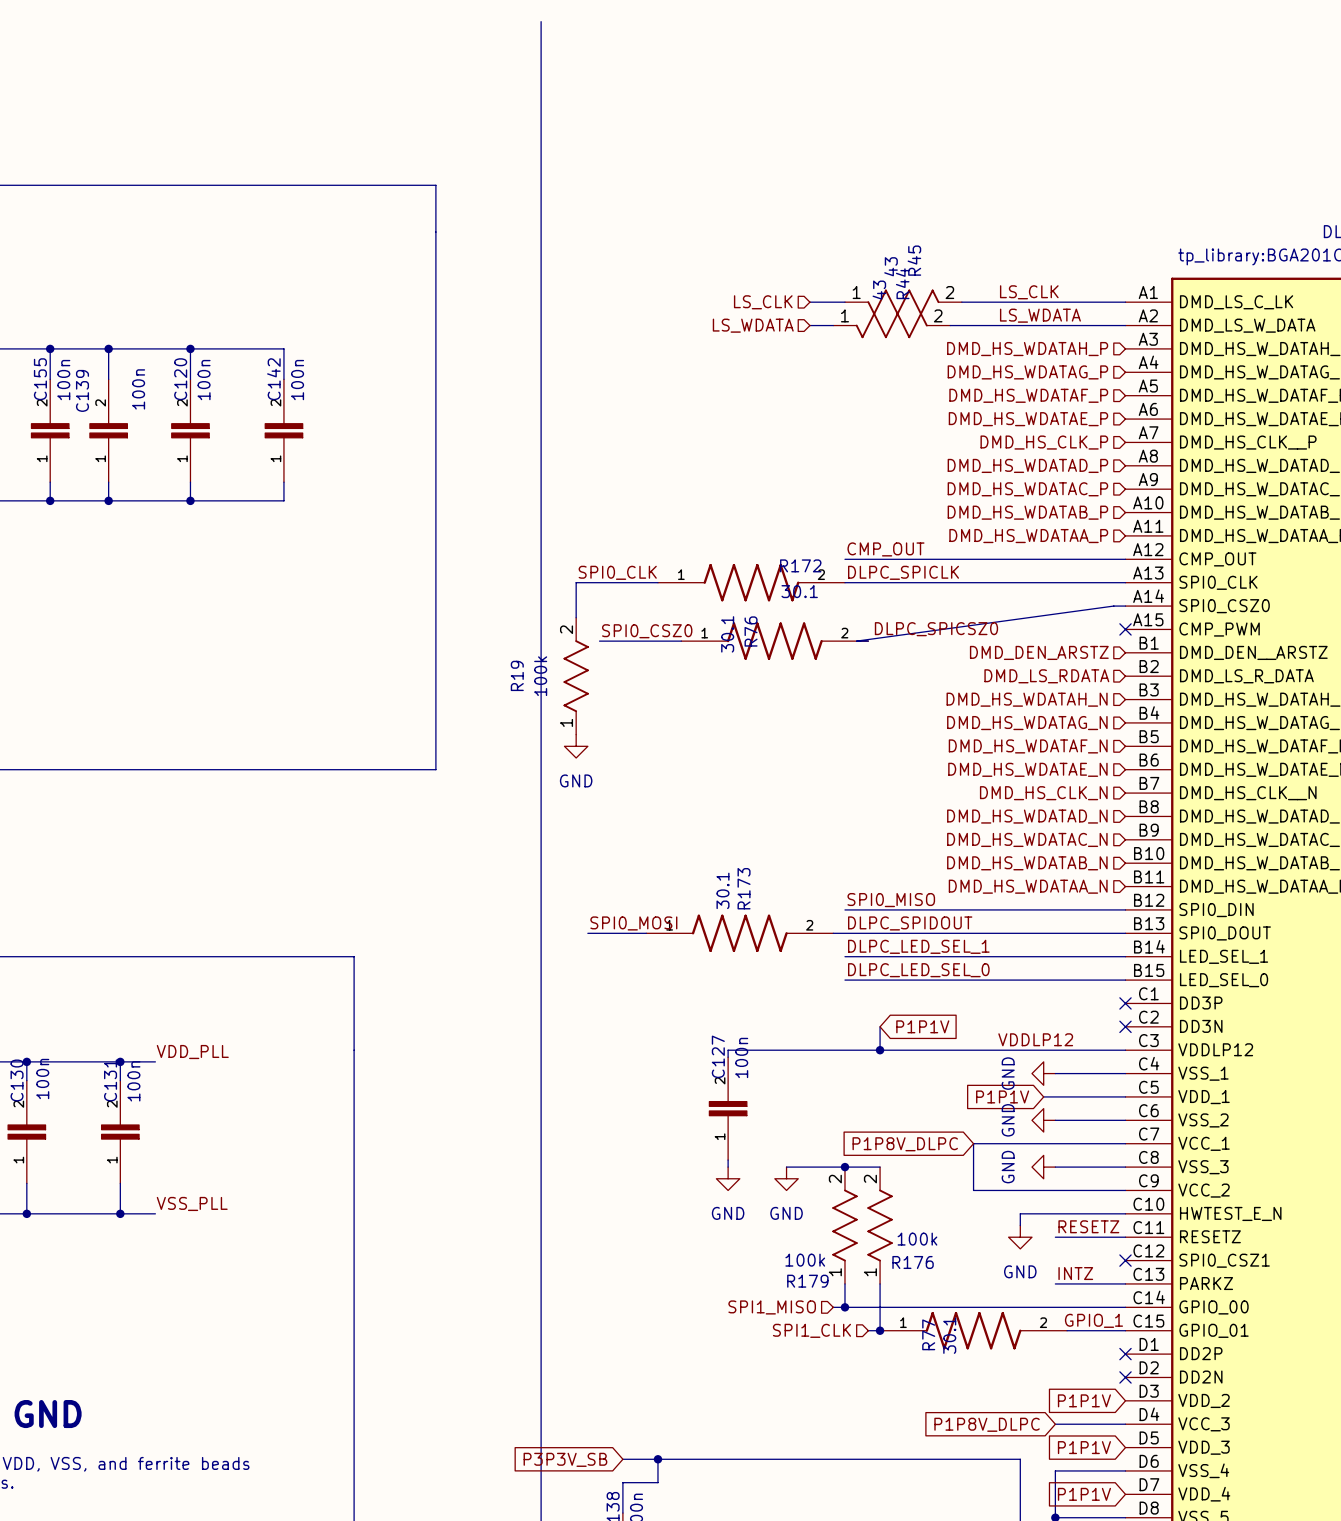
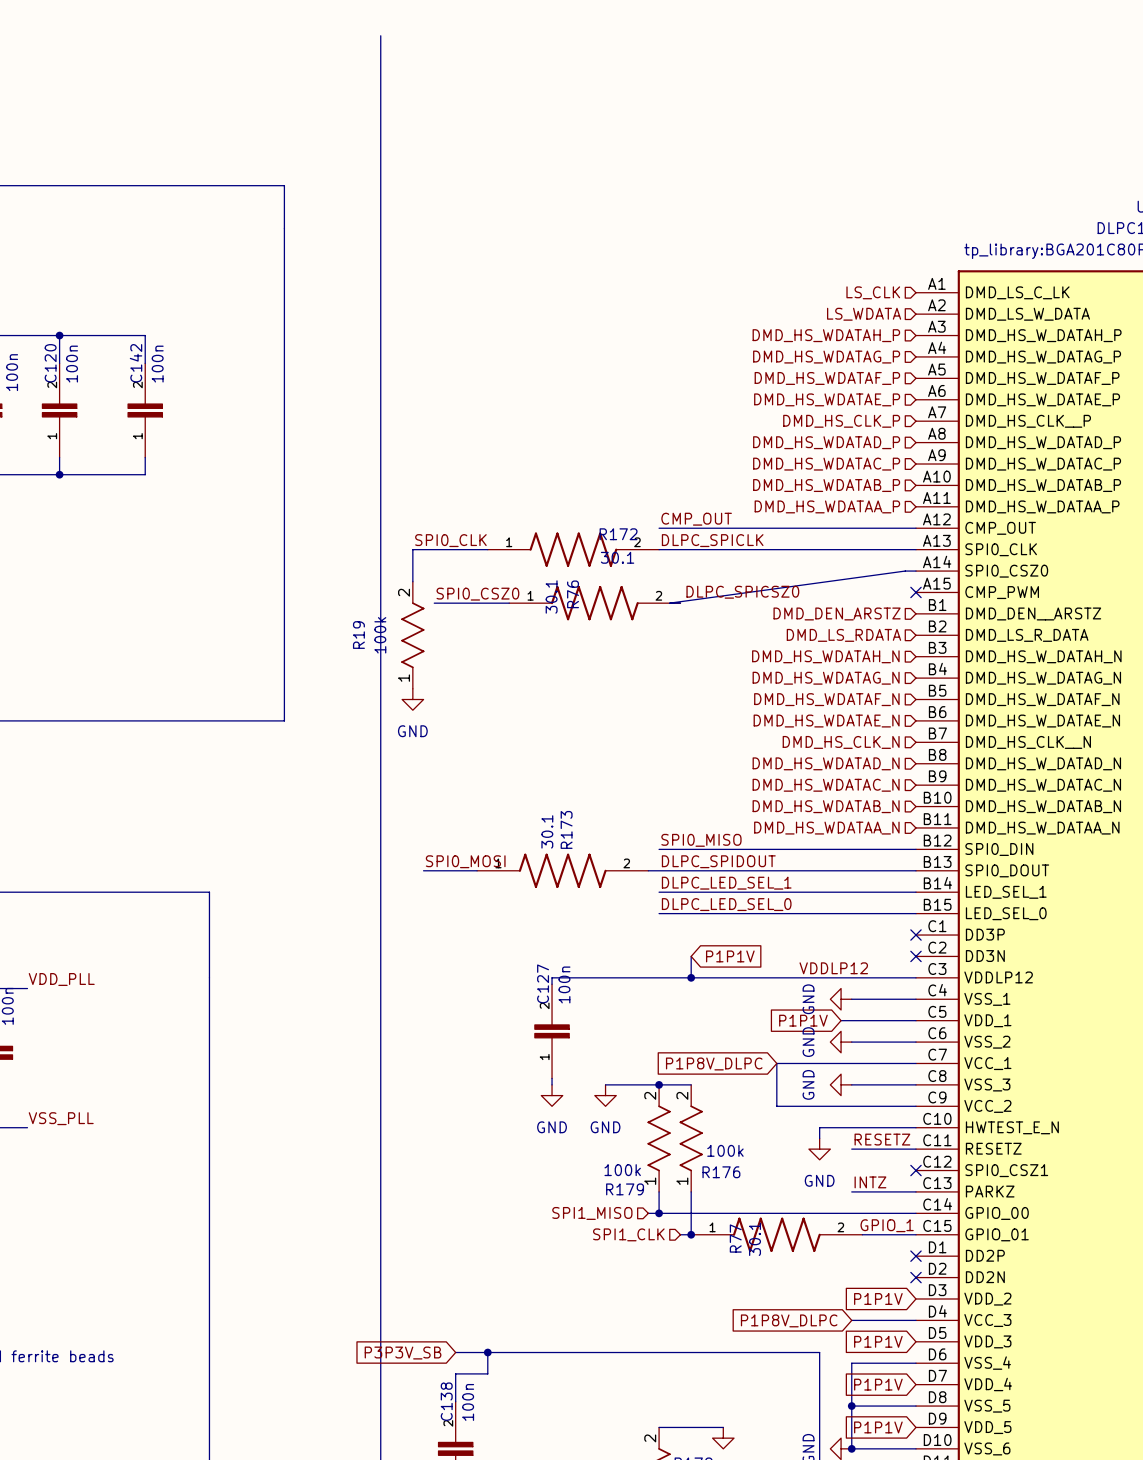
label: LS_CLK (1029, 292) -> none
hierarchical label: LS_CLK (763, 302) -> none
wire: (809, 302) (844, 302) -> none
R45: 43 (903, 302) -> none
wire: (961, 302) (1125, 302) -> none
hierarchical label: none -> LS_CLK (873, 292)
label: LS_WDATA (1040, 315) -> none
hierarchical label: LS_WDATA (753, 325) -> none
wire: (809, 325) (833, 325) -> none
R44: 43 (891, 325) -> none
wire: (950, 325) (1125, 325) -> none
hierarchical label: none -> LS_WDATA (864, 314)

